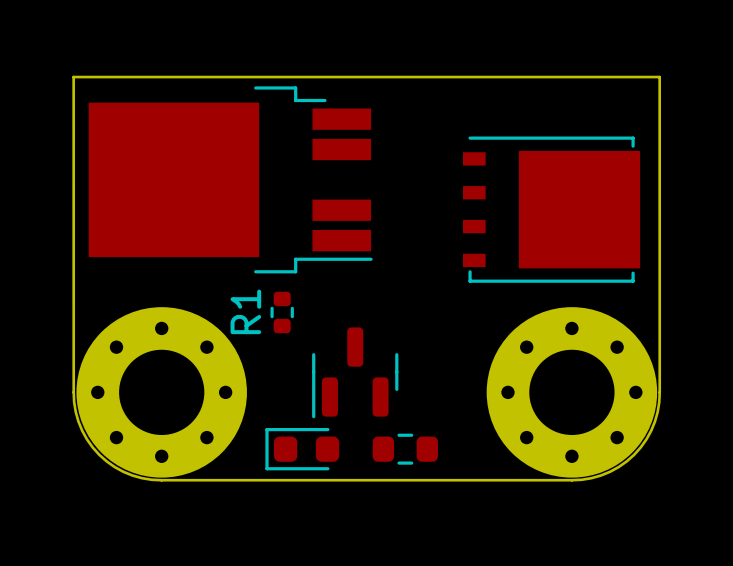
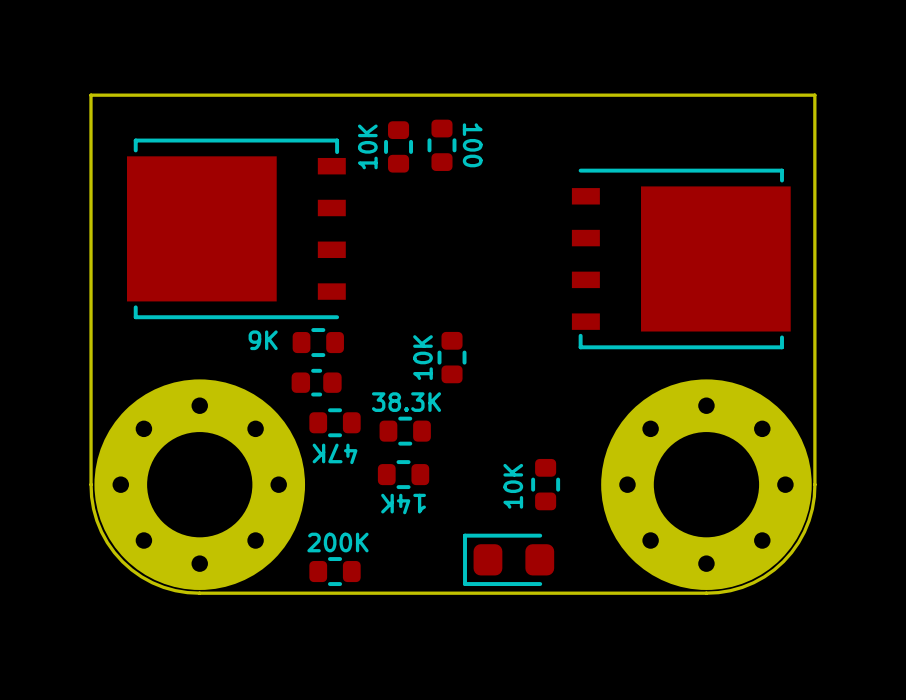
part: none -> (441, 145)
part: none -> (398, 146)
part: (230, 179) -> none
part: none -> (236, 228)
part: none -> (318, 342)
part: none -> (452, 357)
part: none -> (316, 382)
R1: (282, 312) -> none
part: none -> (335, 422)
part: none -> (405, 431)
part: (355, 372) -> none
part: none -> (403, 474)
part: none -> (545, 484)
part footprint: [372, 433, 438, 465] -> [463, 533, 555, 586]
part: (302, 449) -> none
part: none -> (335, 571)

